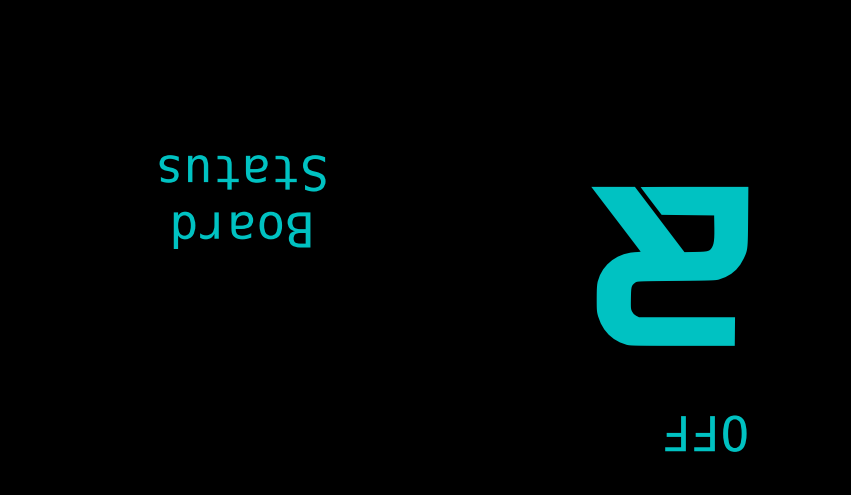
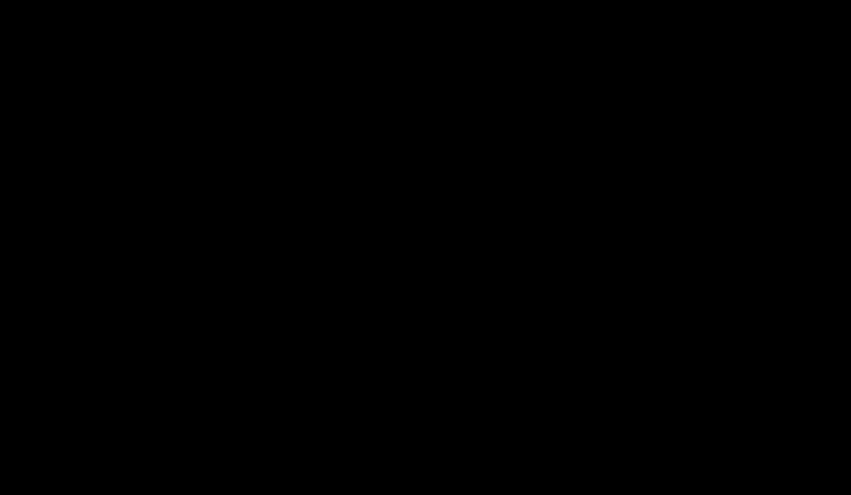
text: Status (242, 173) -> none
drawing: [591, 186, 749, 346] -> none
text: Board (242, 230) -> none
text: OFF (705, 433) -> none

